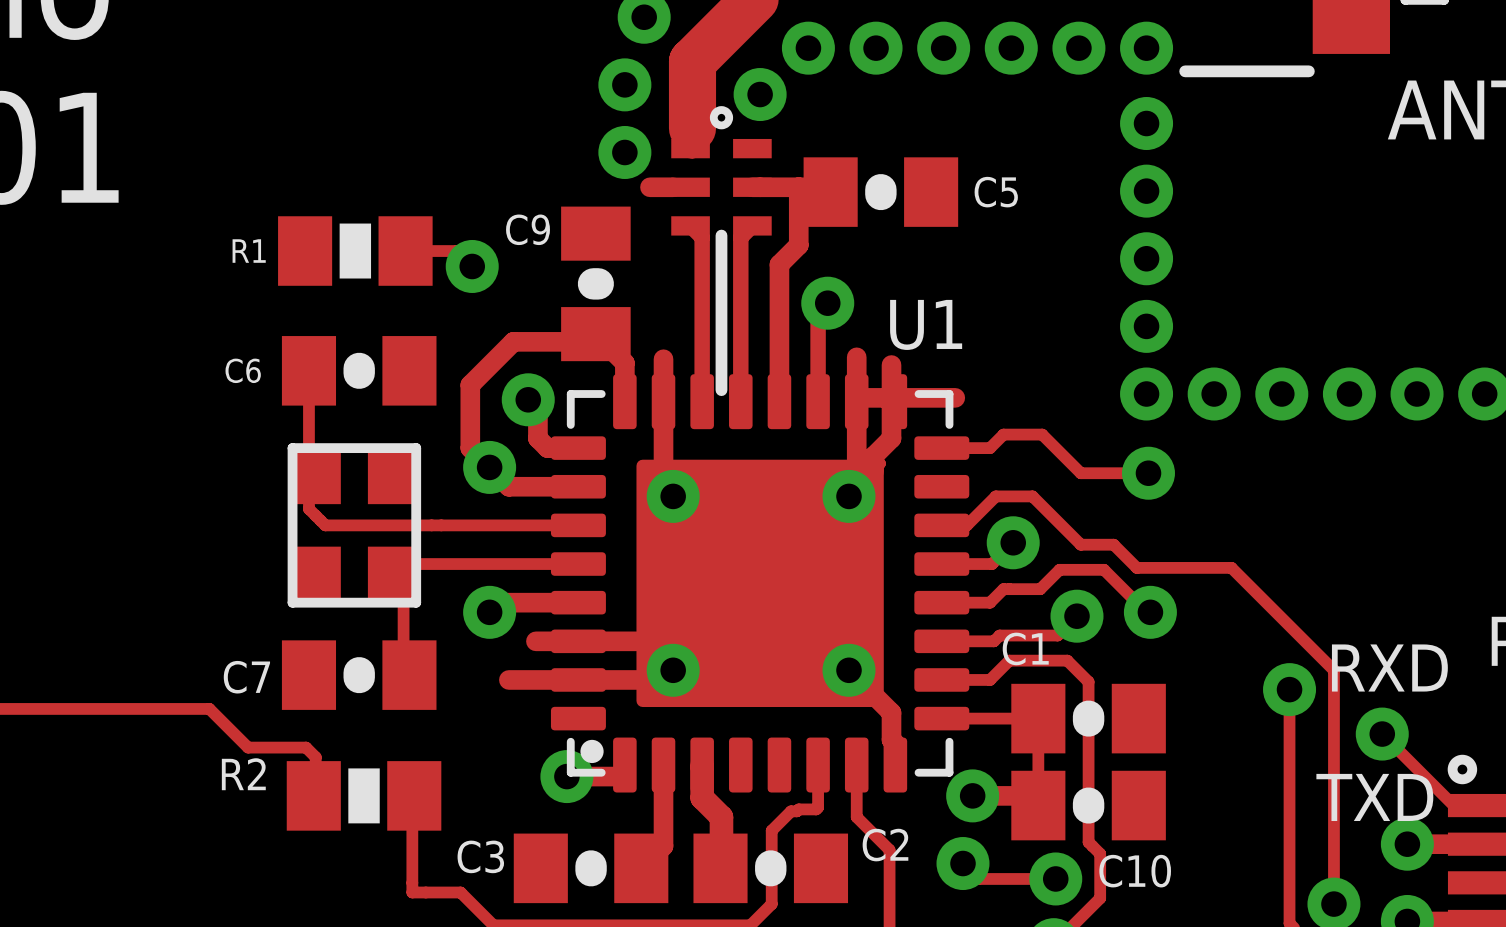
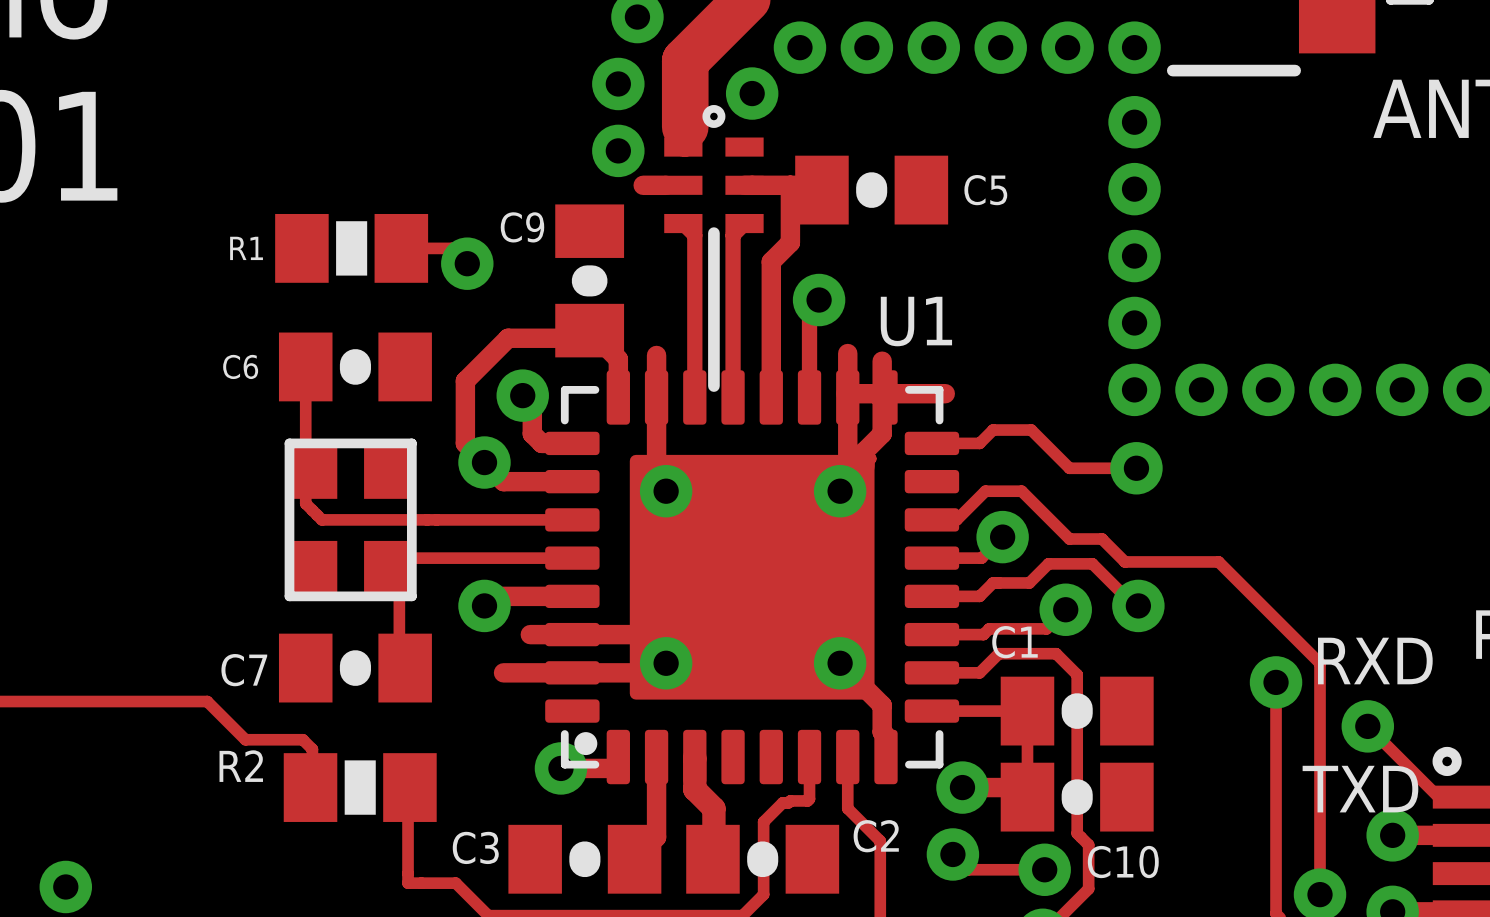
via: none -> (65, 886)

